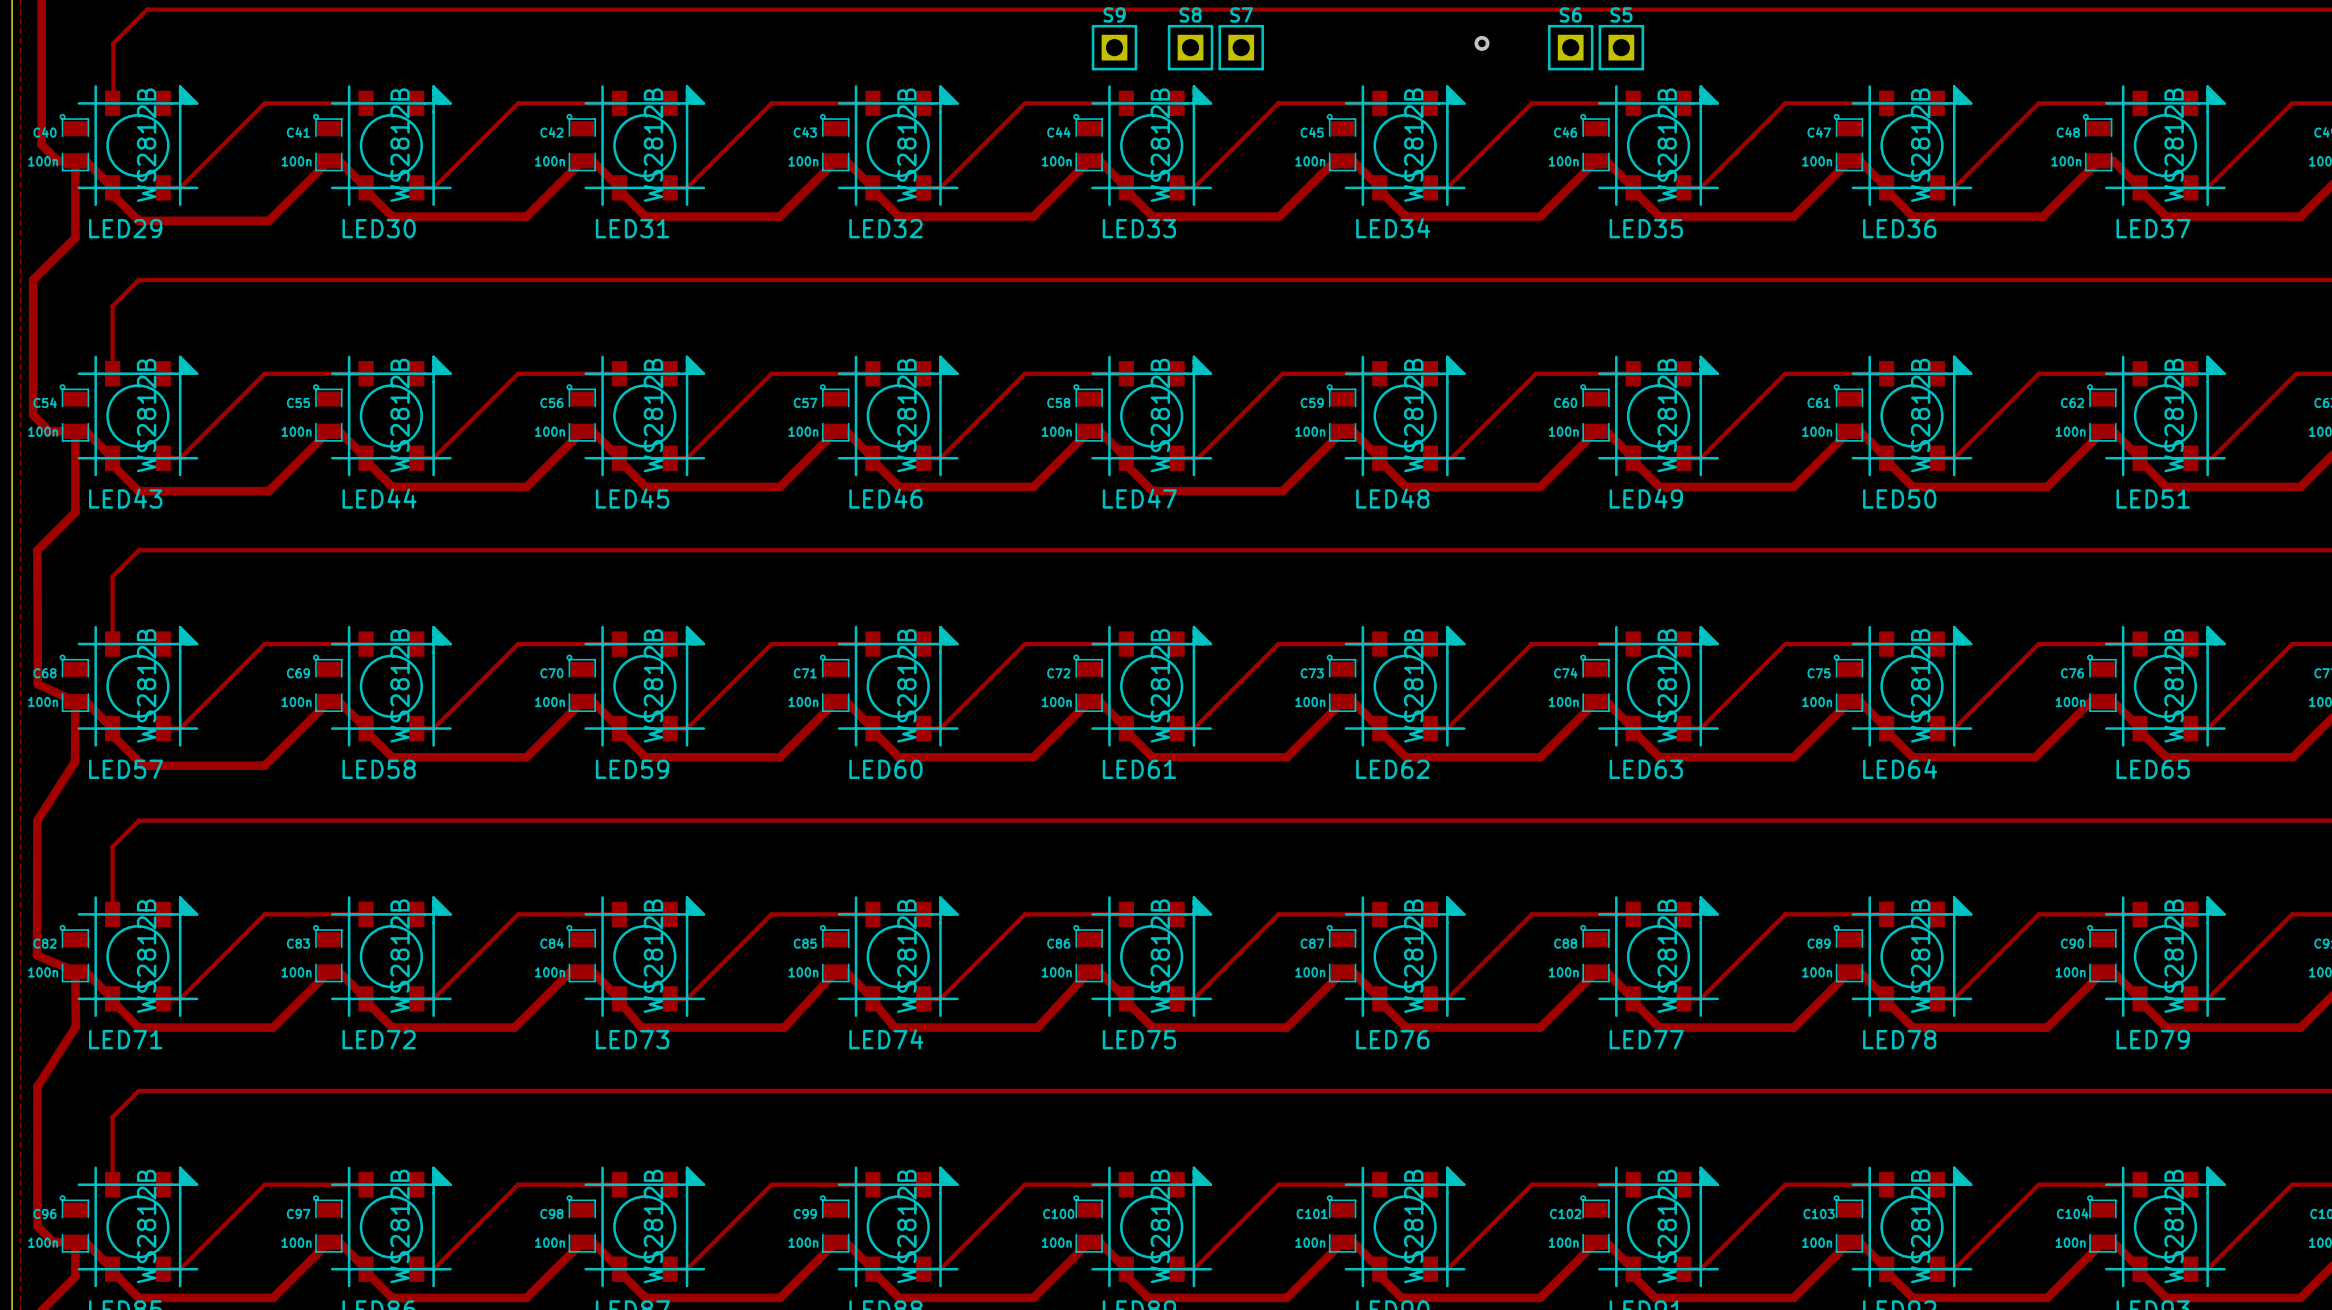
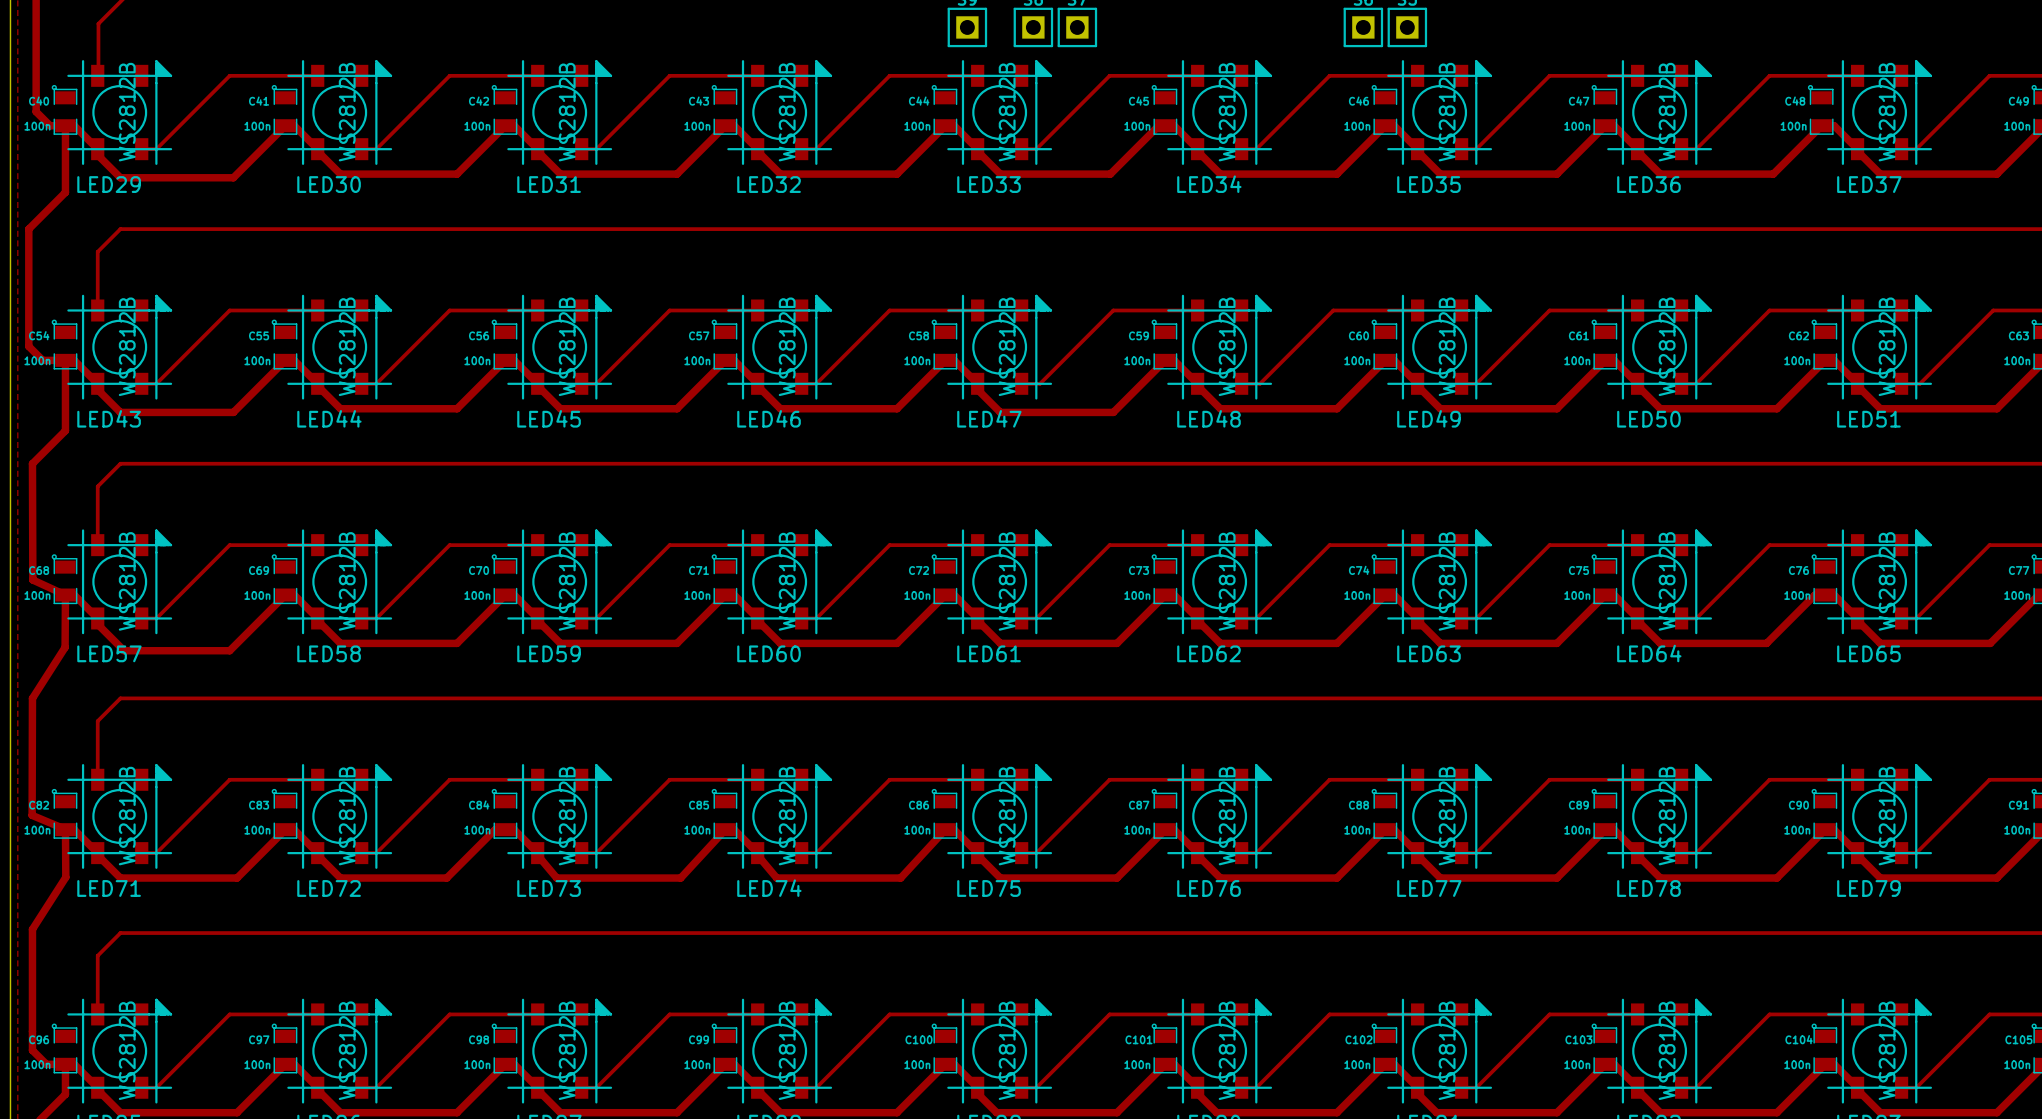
via: (1481, 43) -> none

